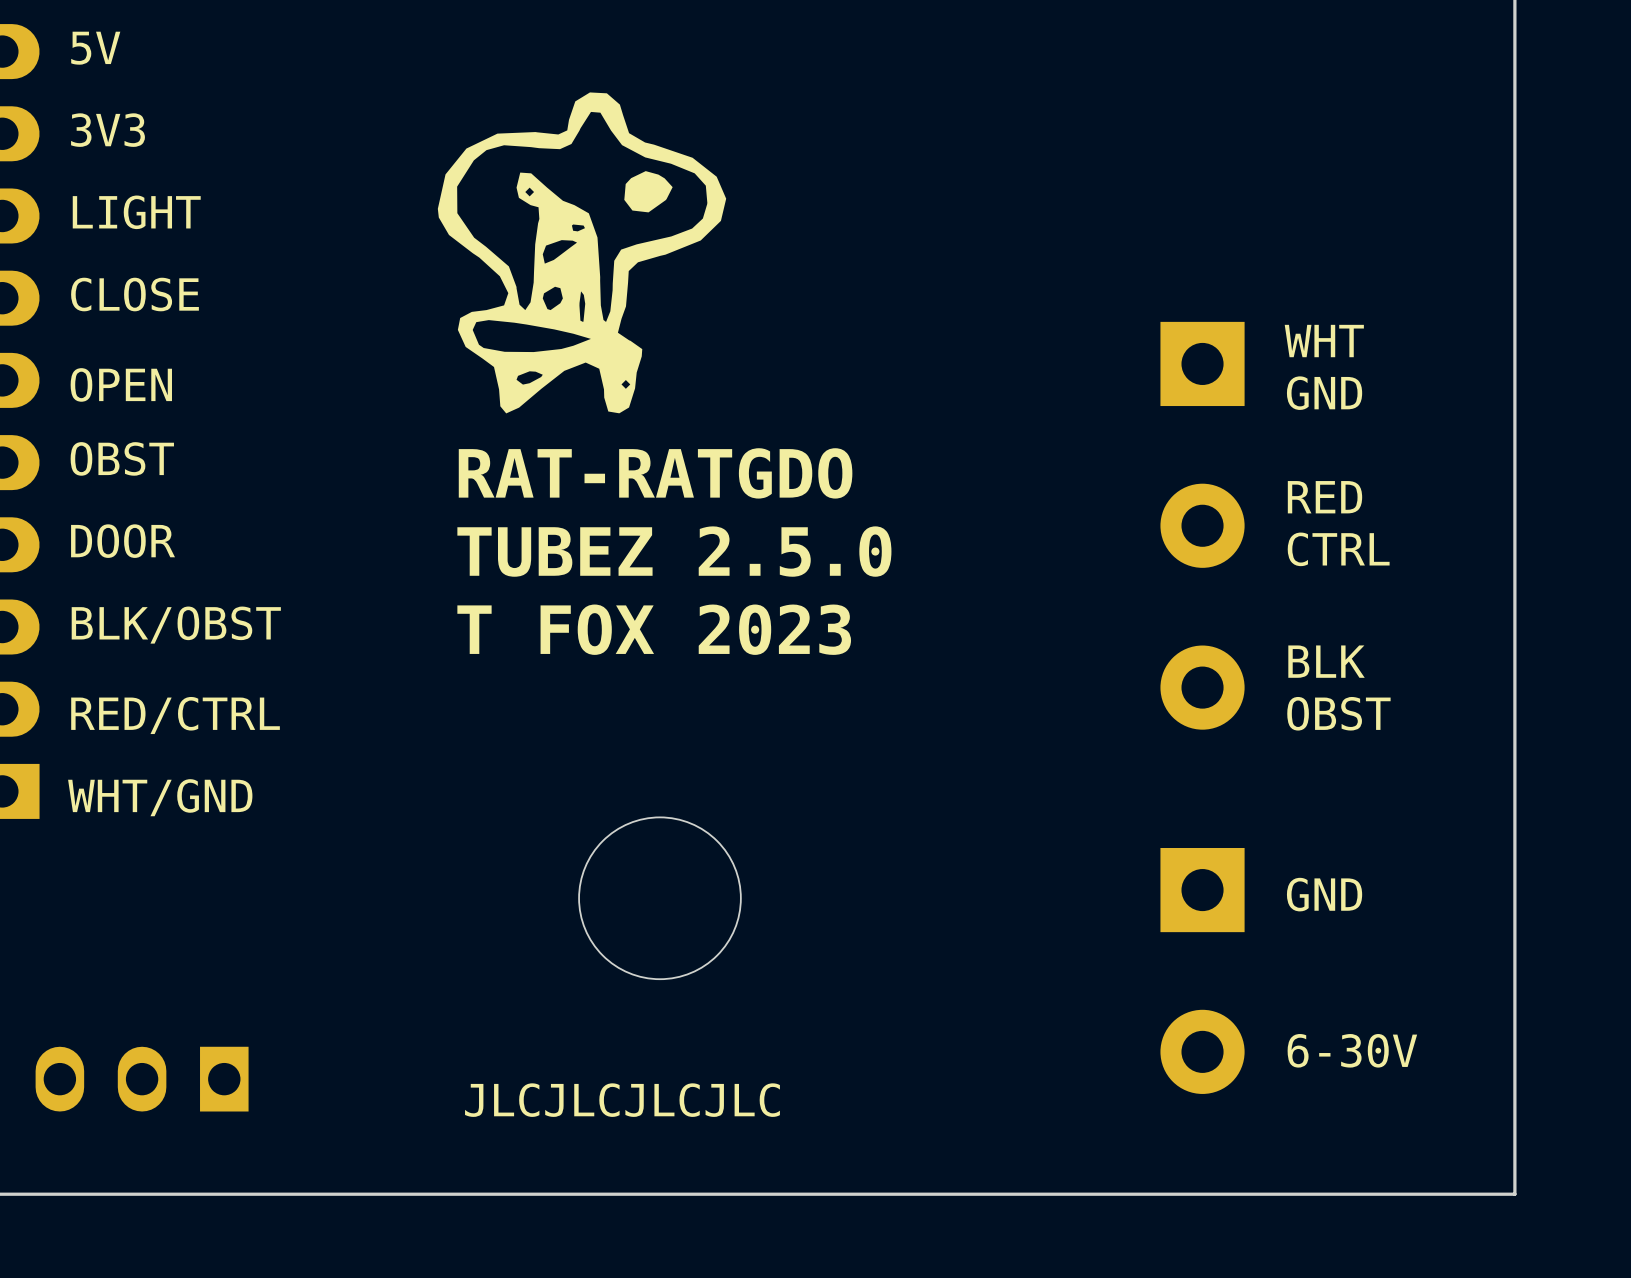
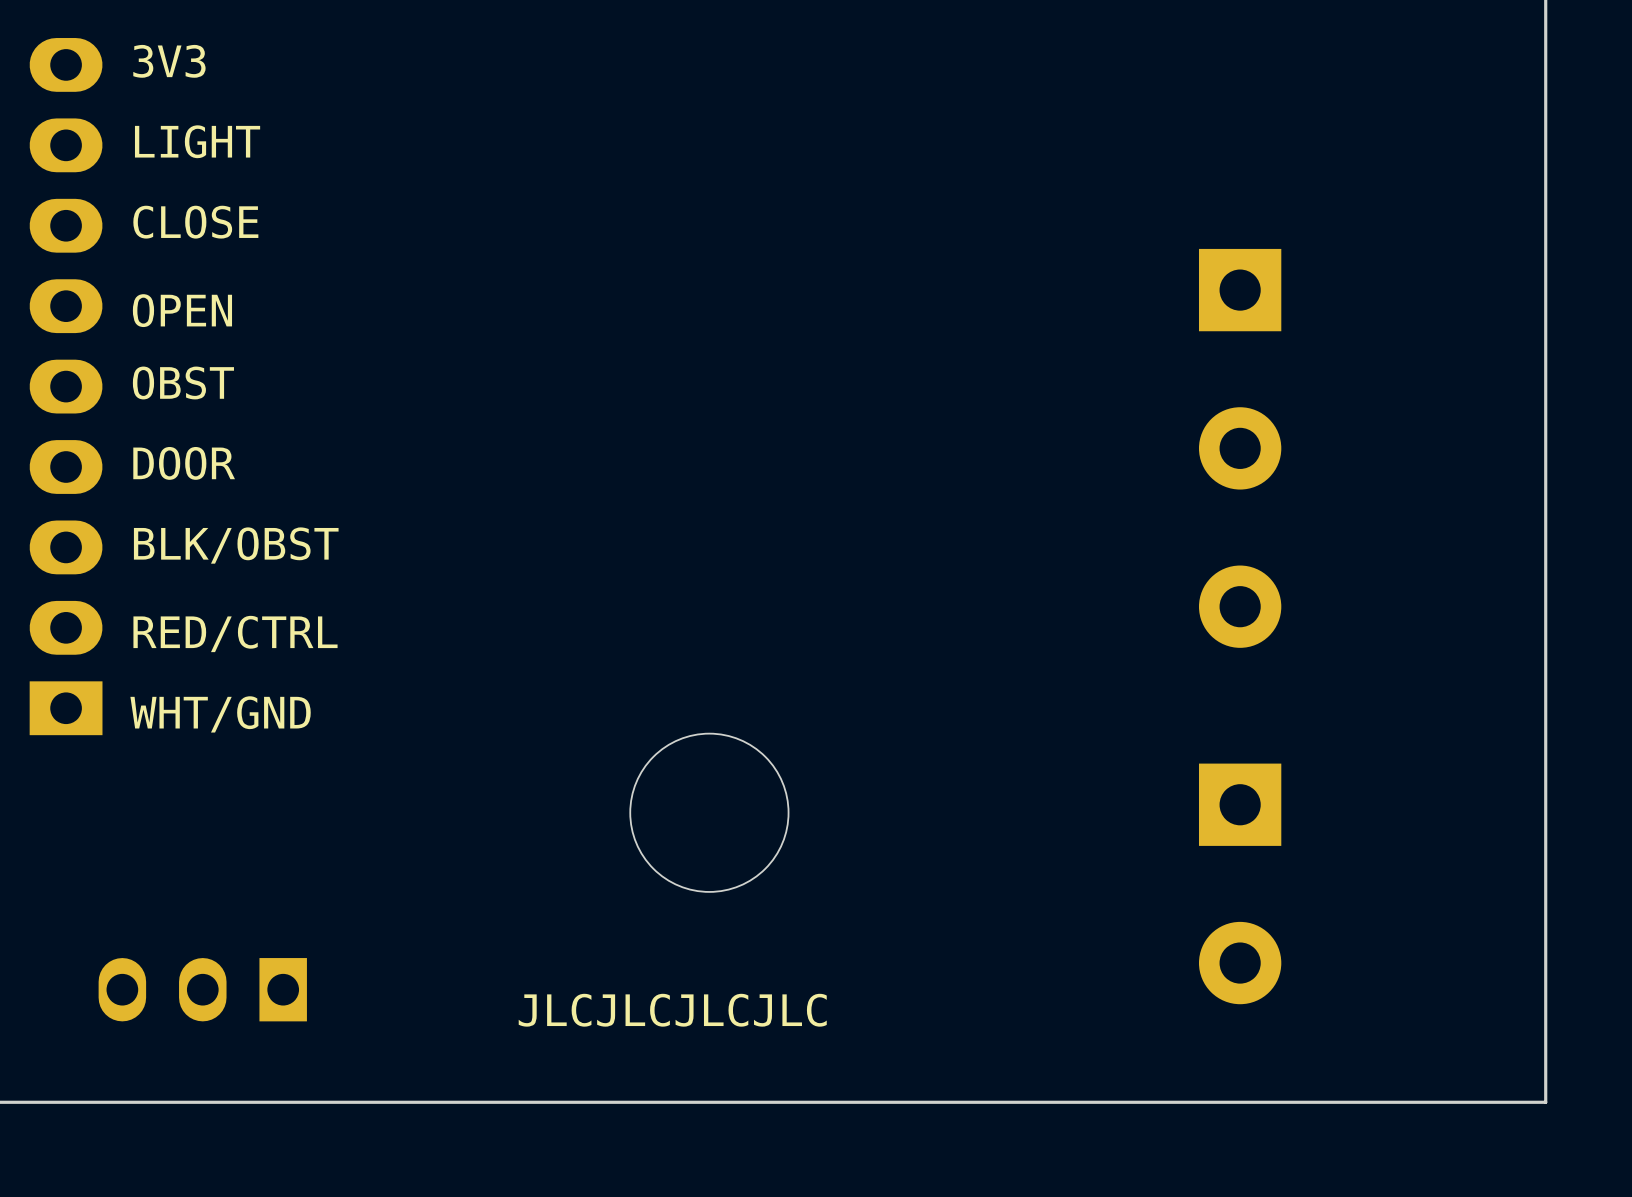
drawing: [437, 92, 727, 414] -> none
text: WHT (1324, 341) -> none
text: GND (1324, 393) -> none
text: RAT-RATGDO (655, 473) -> none
text: RED (1324, 497) -> none
text: CTRL (1338, 549) -> none
text: TUBEZ 2.5.0 (674, 551) -> none
text: T FOX 2023 (654, 629) -> none
text: BLK (1326, 661) -> none
text: OBST (1338, 713) -> none
text: GND (1324, 894) -> none
text: 6-30V (1352, 1050) -> none

